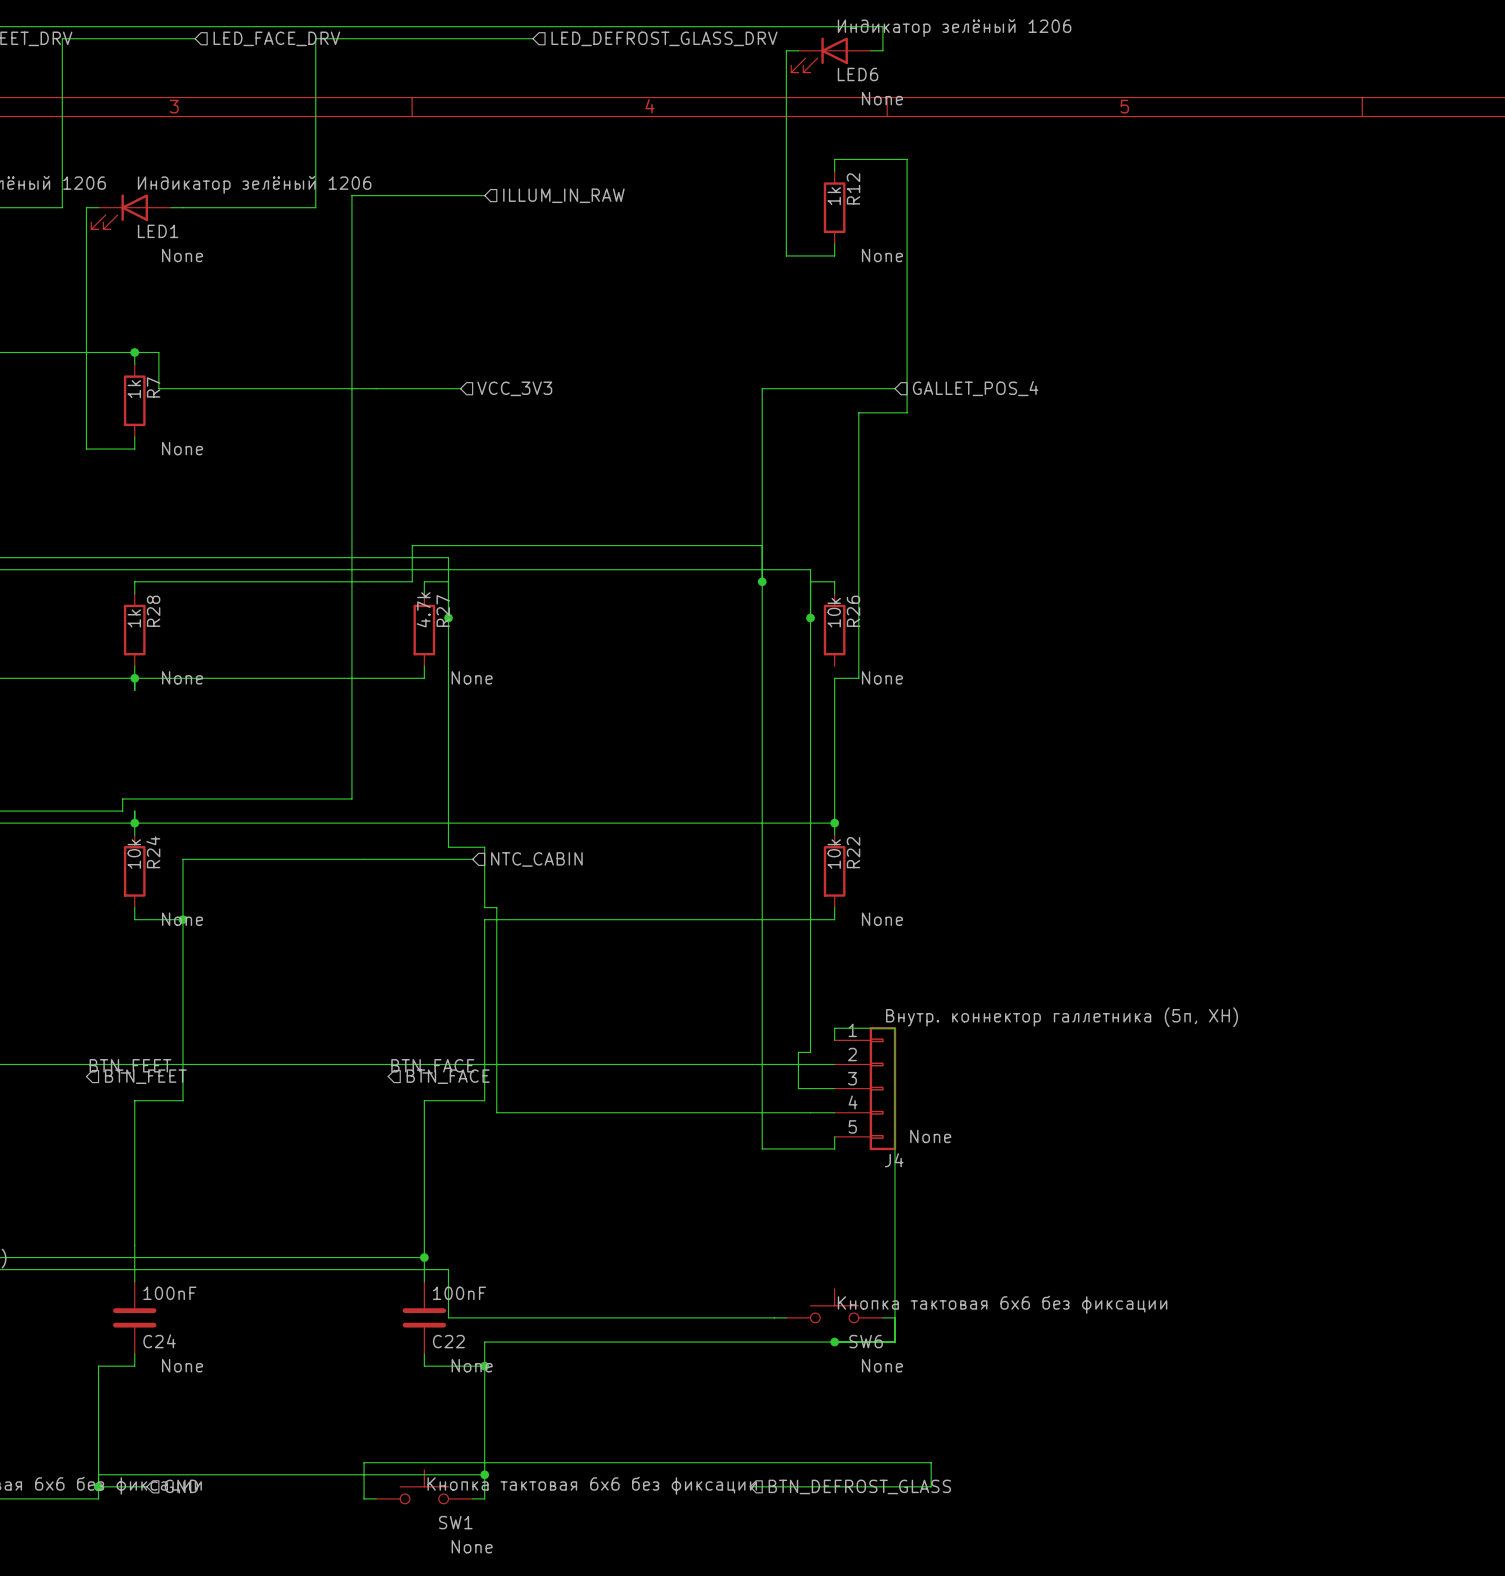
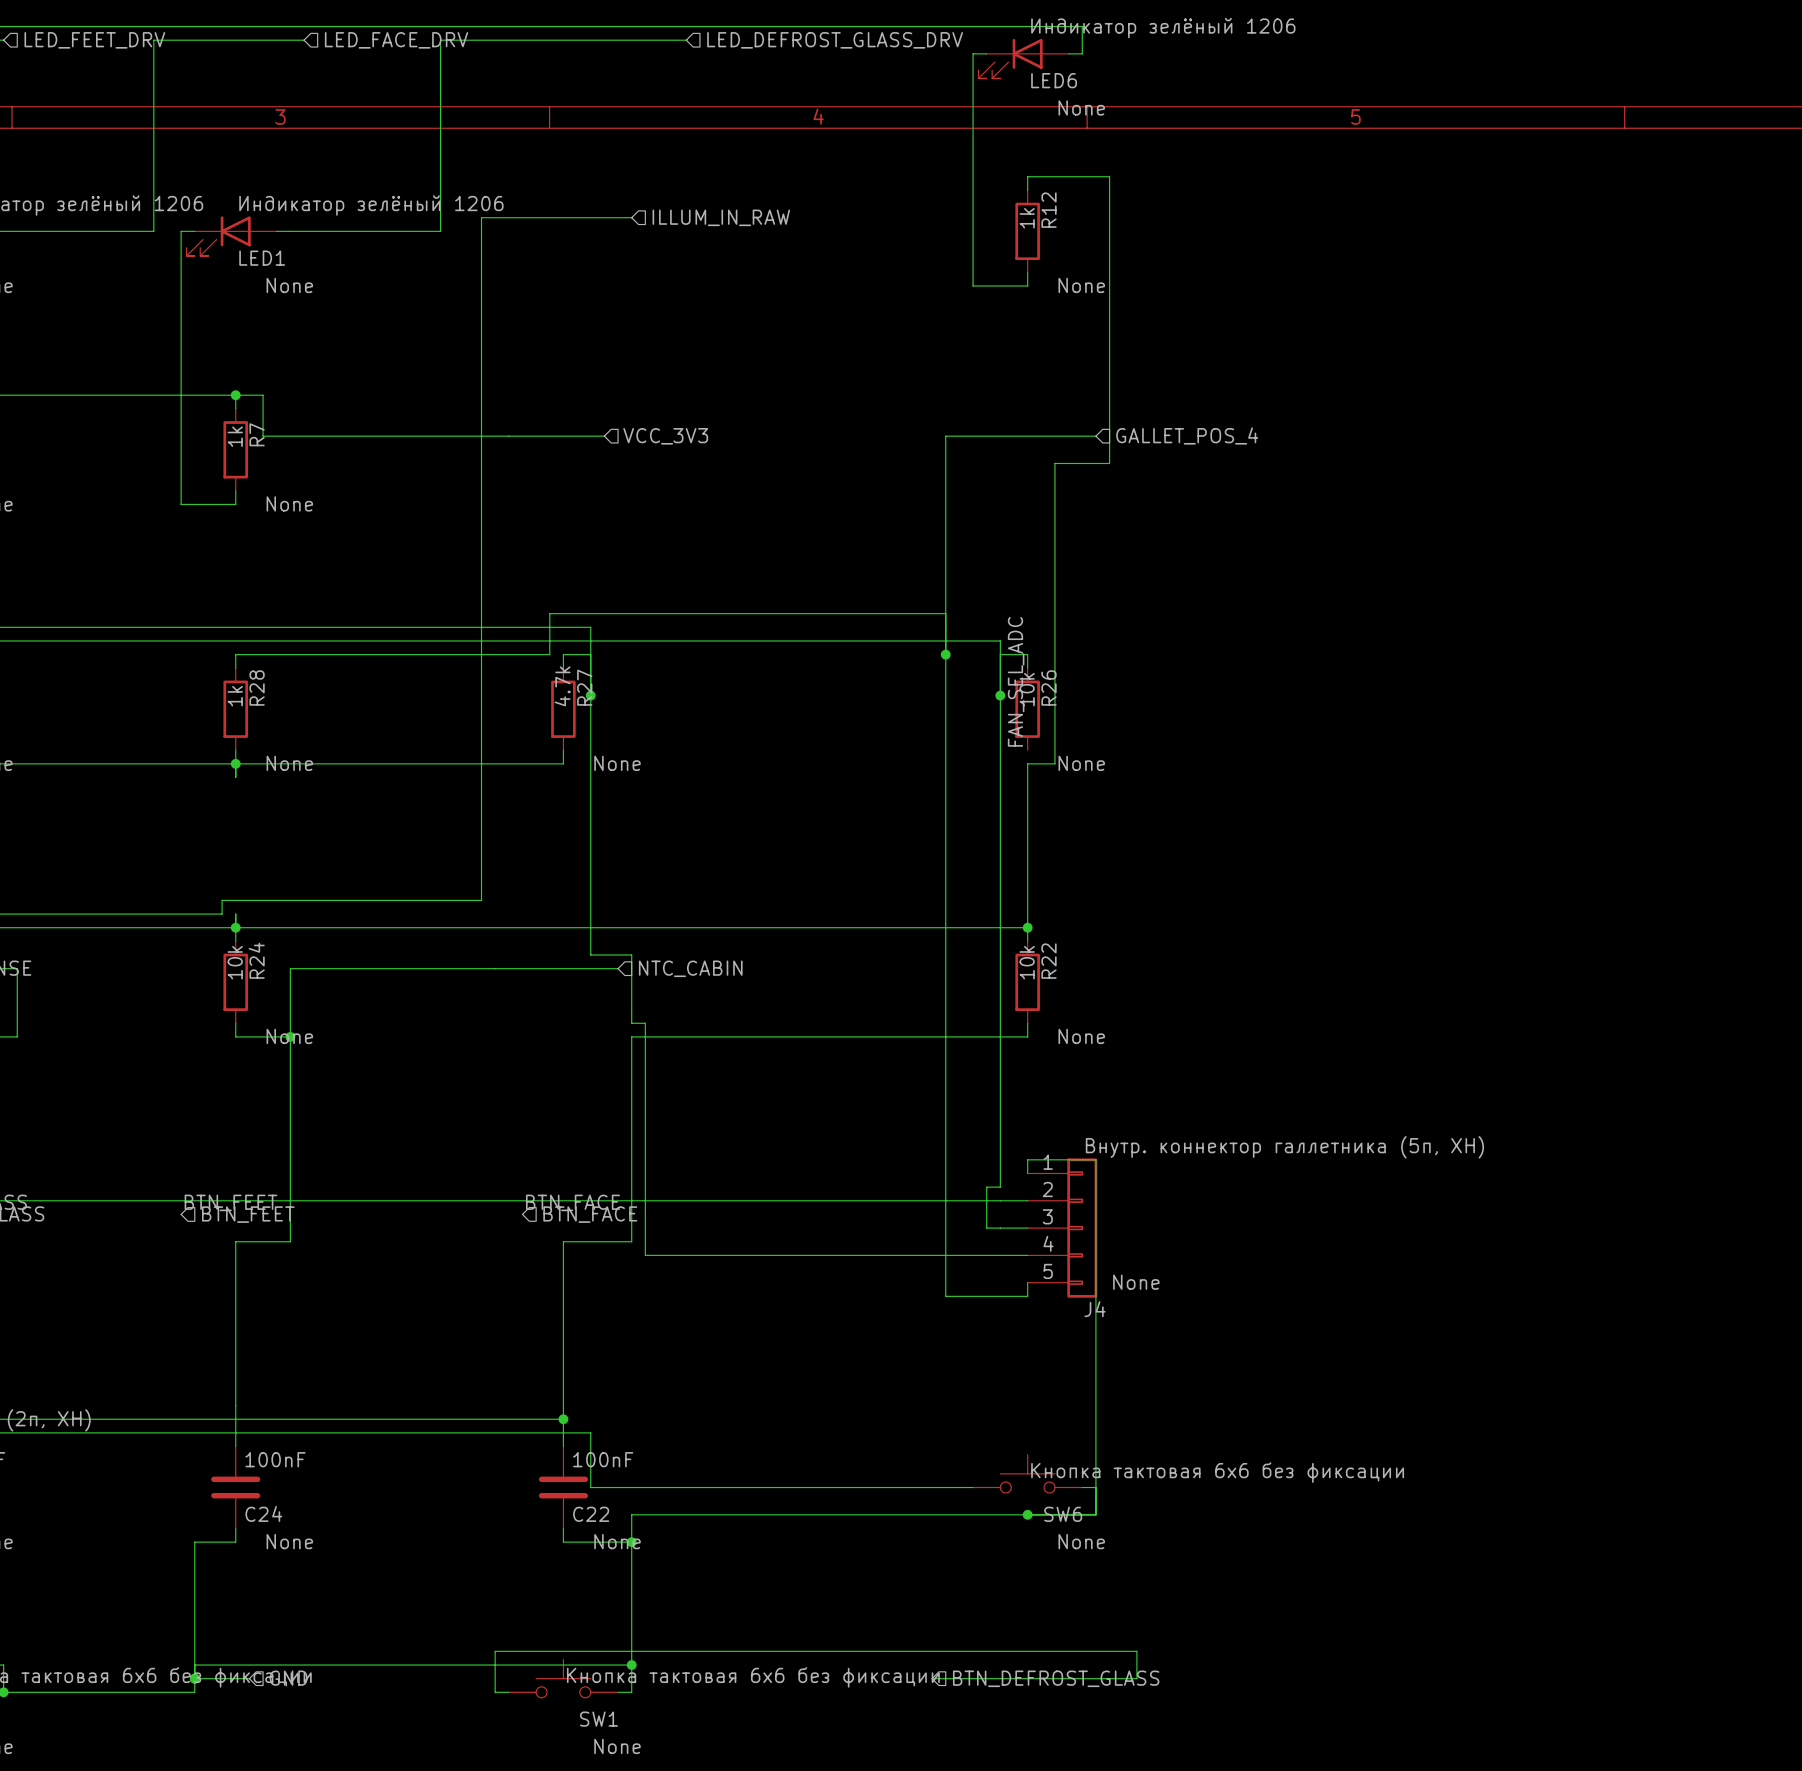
label: none -> FAN_SEL_ADC (1016, 681)

